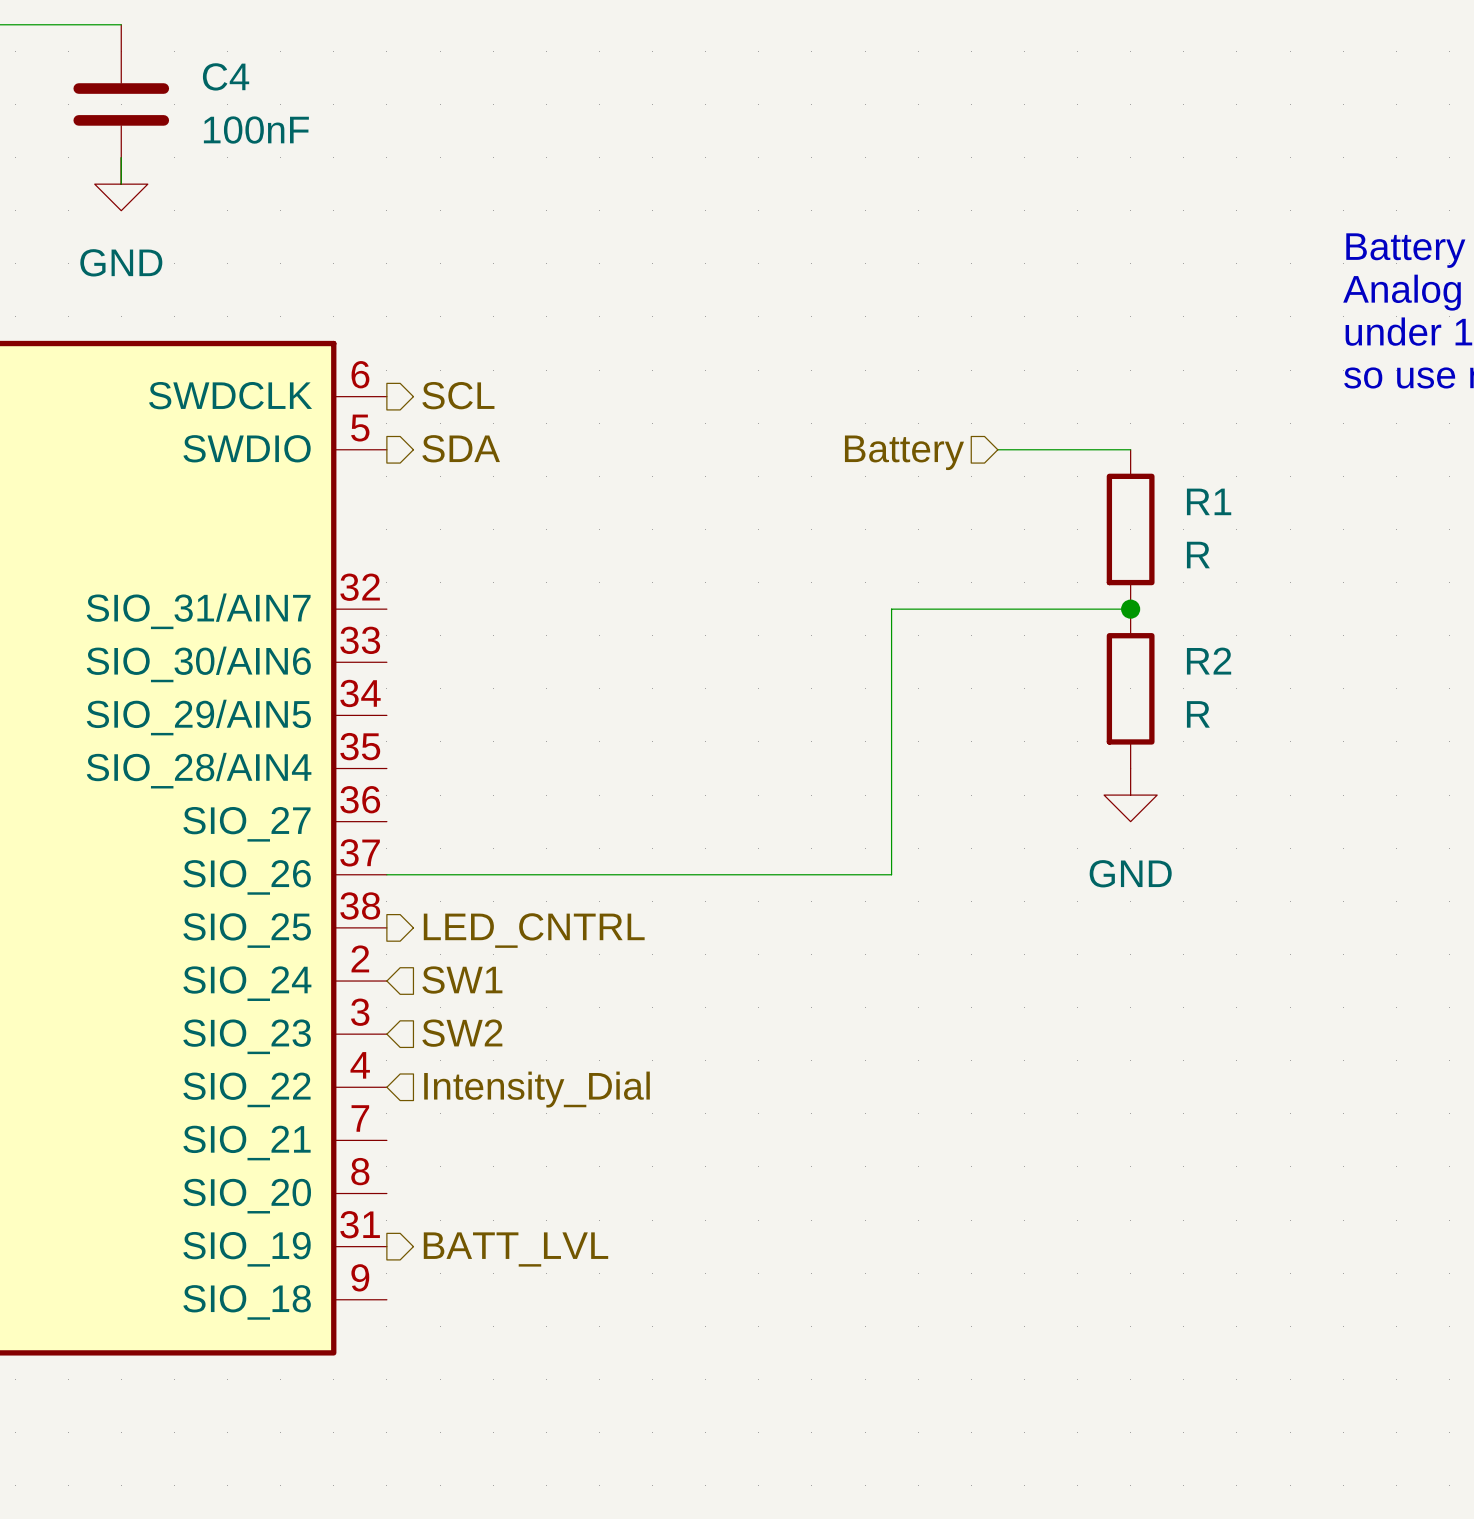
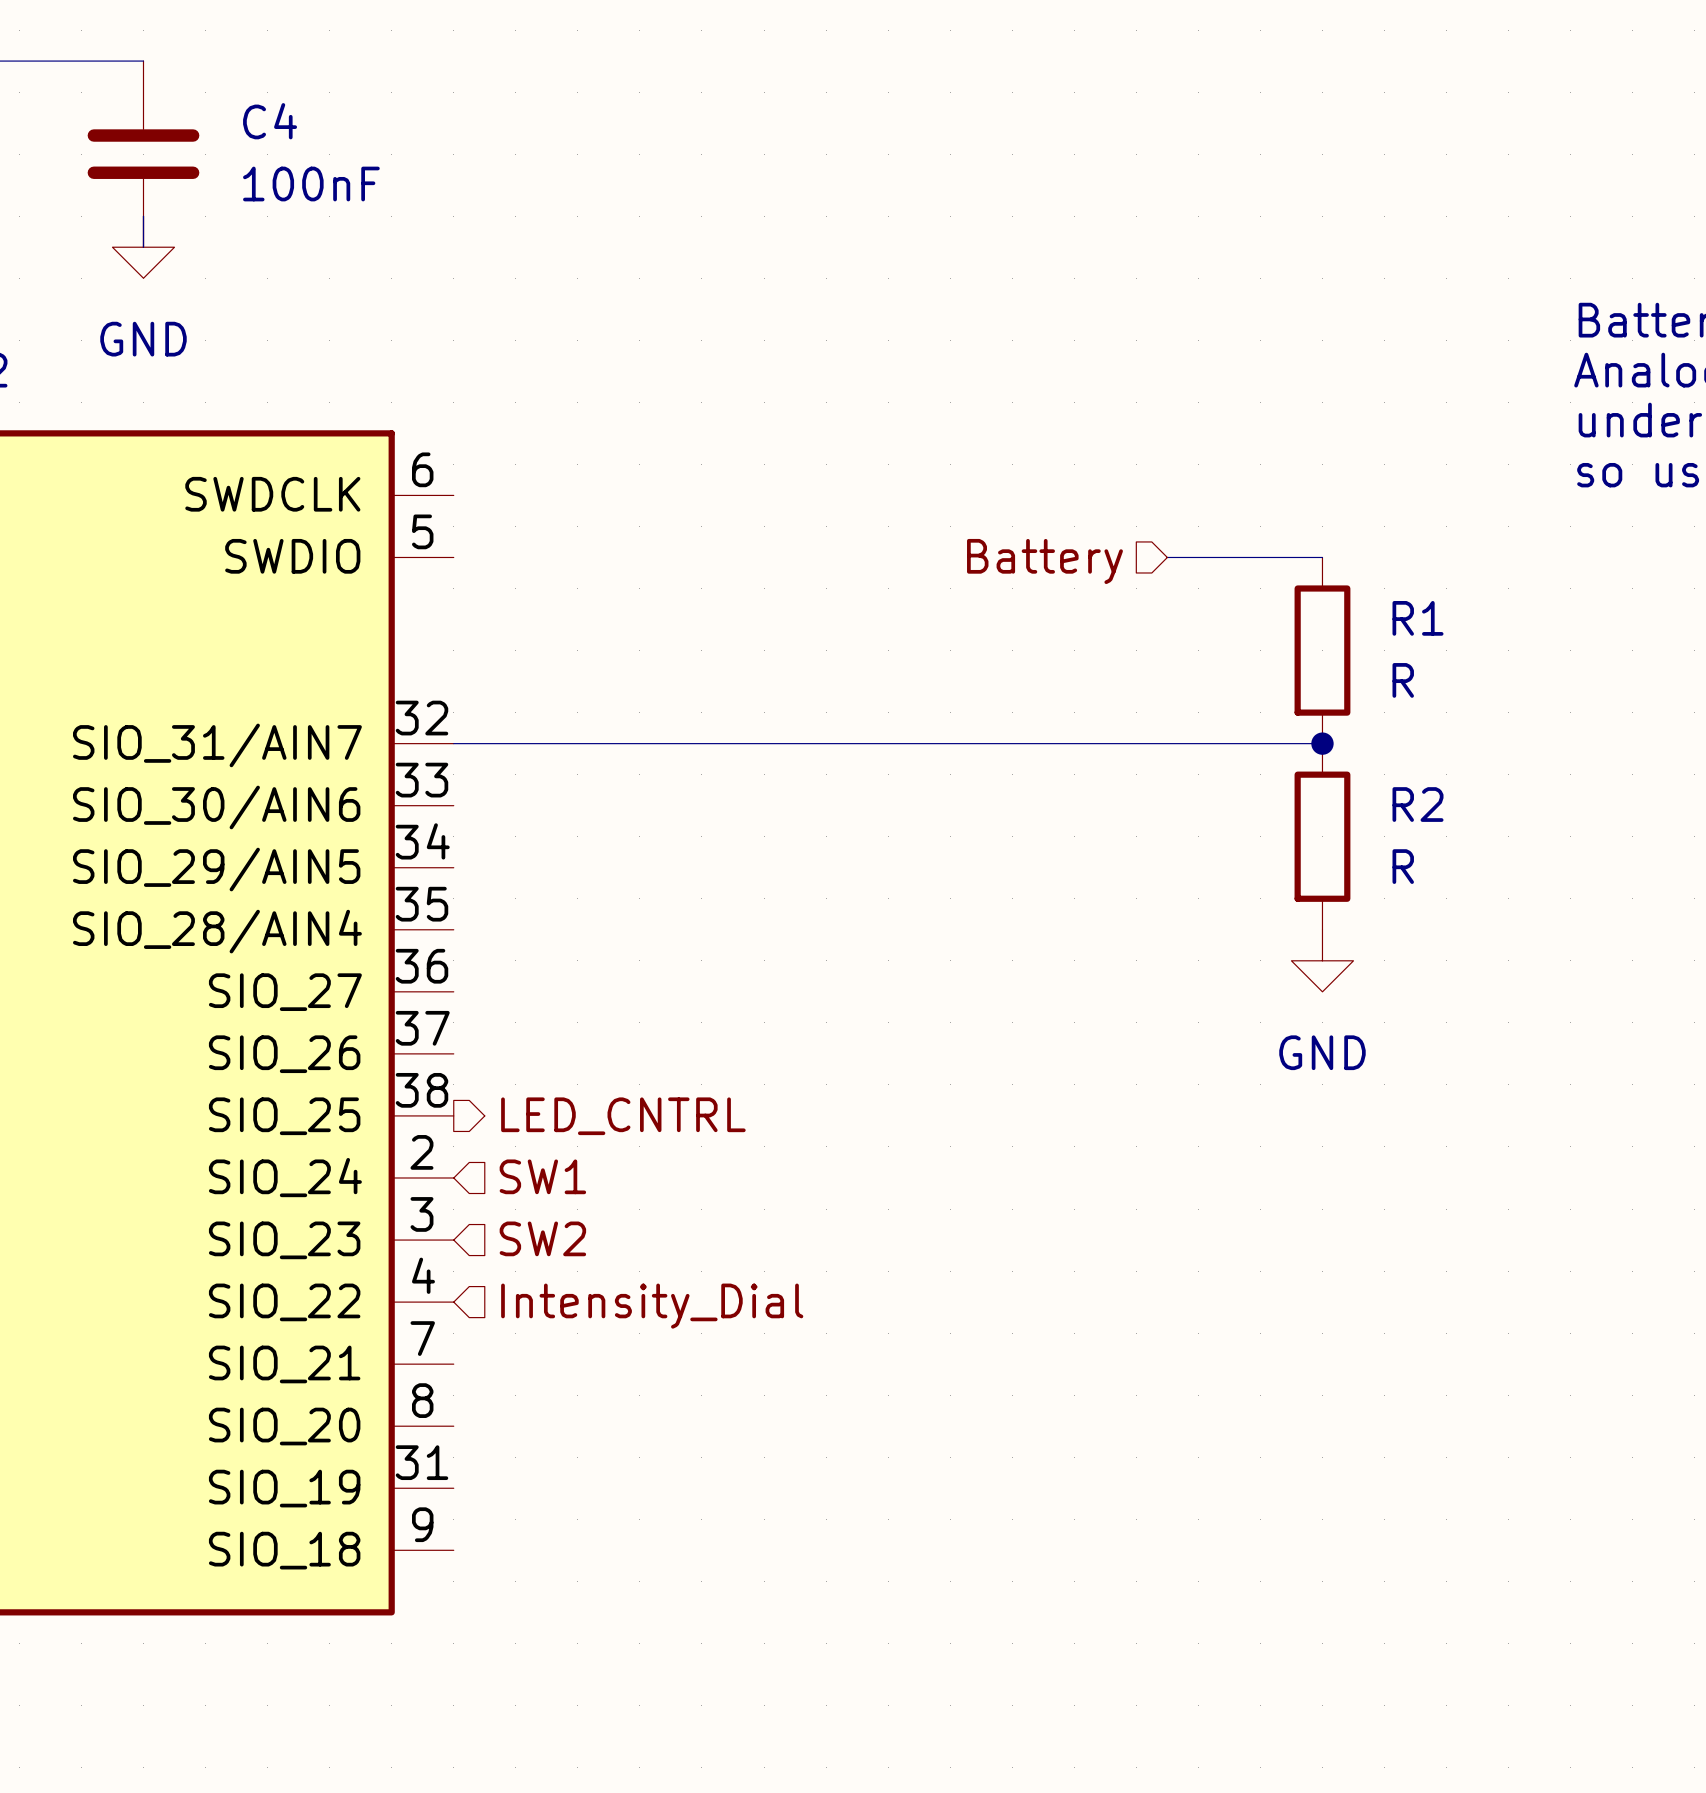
hierarchical label: SCL (458, 395) -> none
hierarchical label: SDA (461, 448) -> none
wire: (891, 609) (891, 874) (386, 874) -> (1043, 743) (453, 743)
hierarchical label: BATT_LVL (515, 1249) -> none

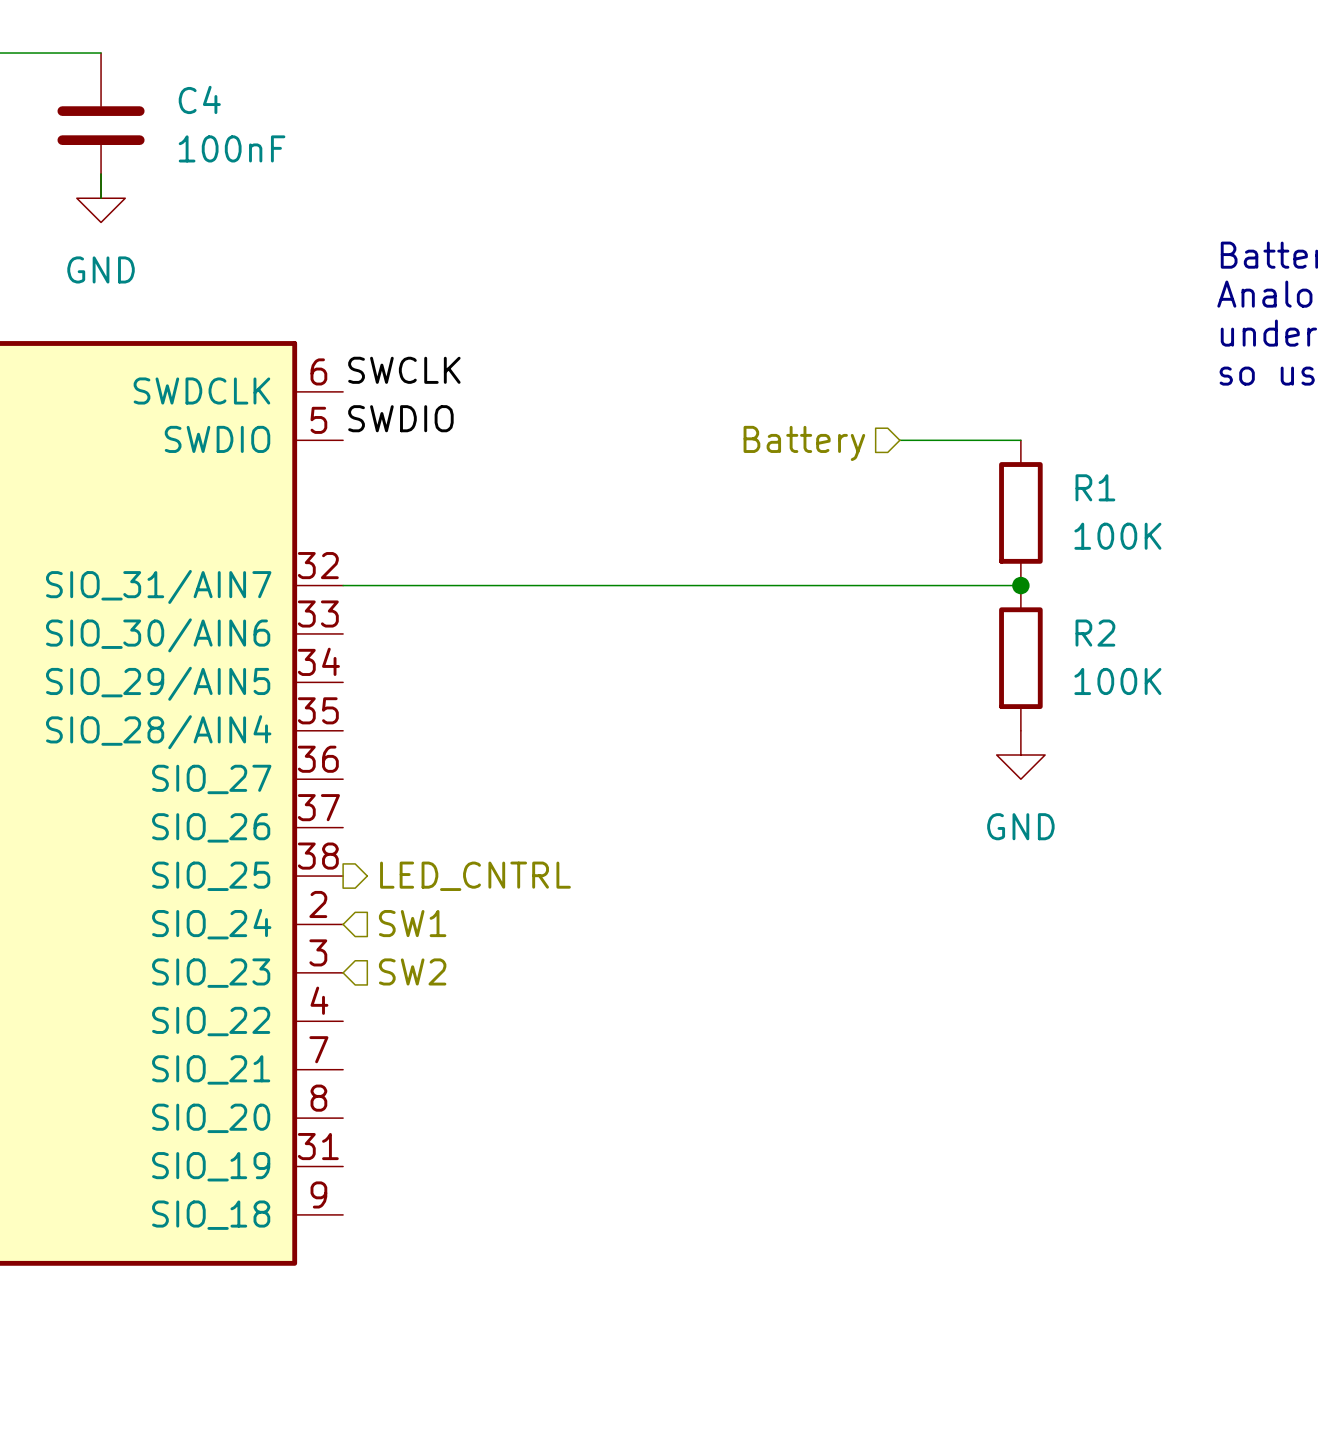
label: none -> SWCLK (404, 370)
label: none -> SWDIO (400, 418)
R1 value: R (1403, 680) -> 100K (1117, 536)
R2 value: R (1403, 866) -> 100K (1117, 681)
hierarchical label: Intensity_Dial (652, 1306) -> none

